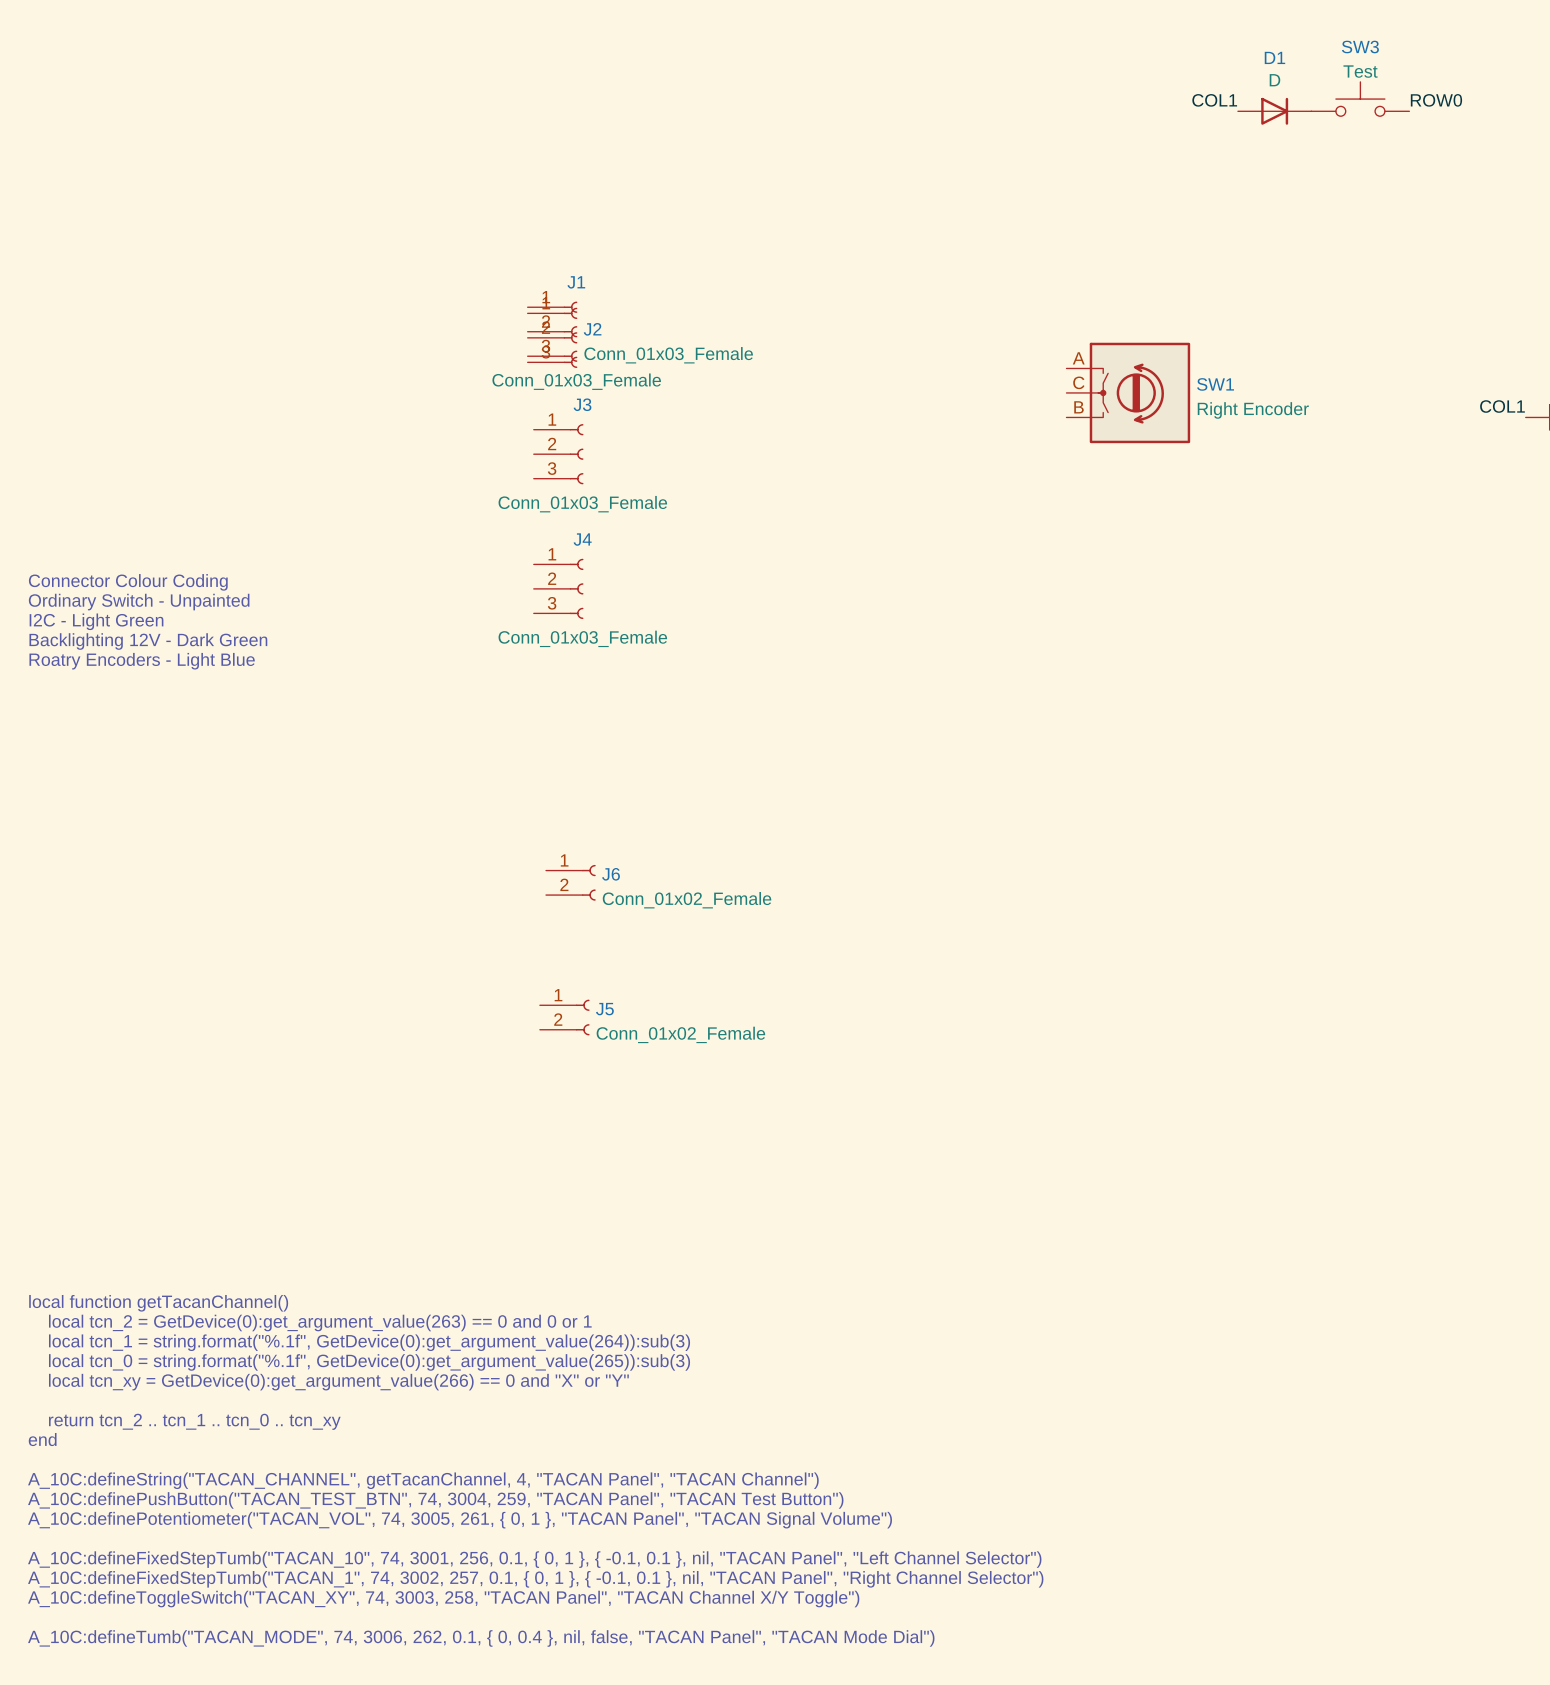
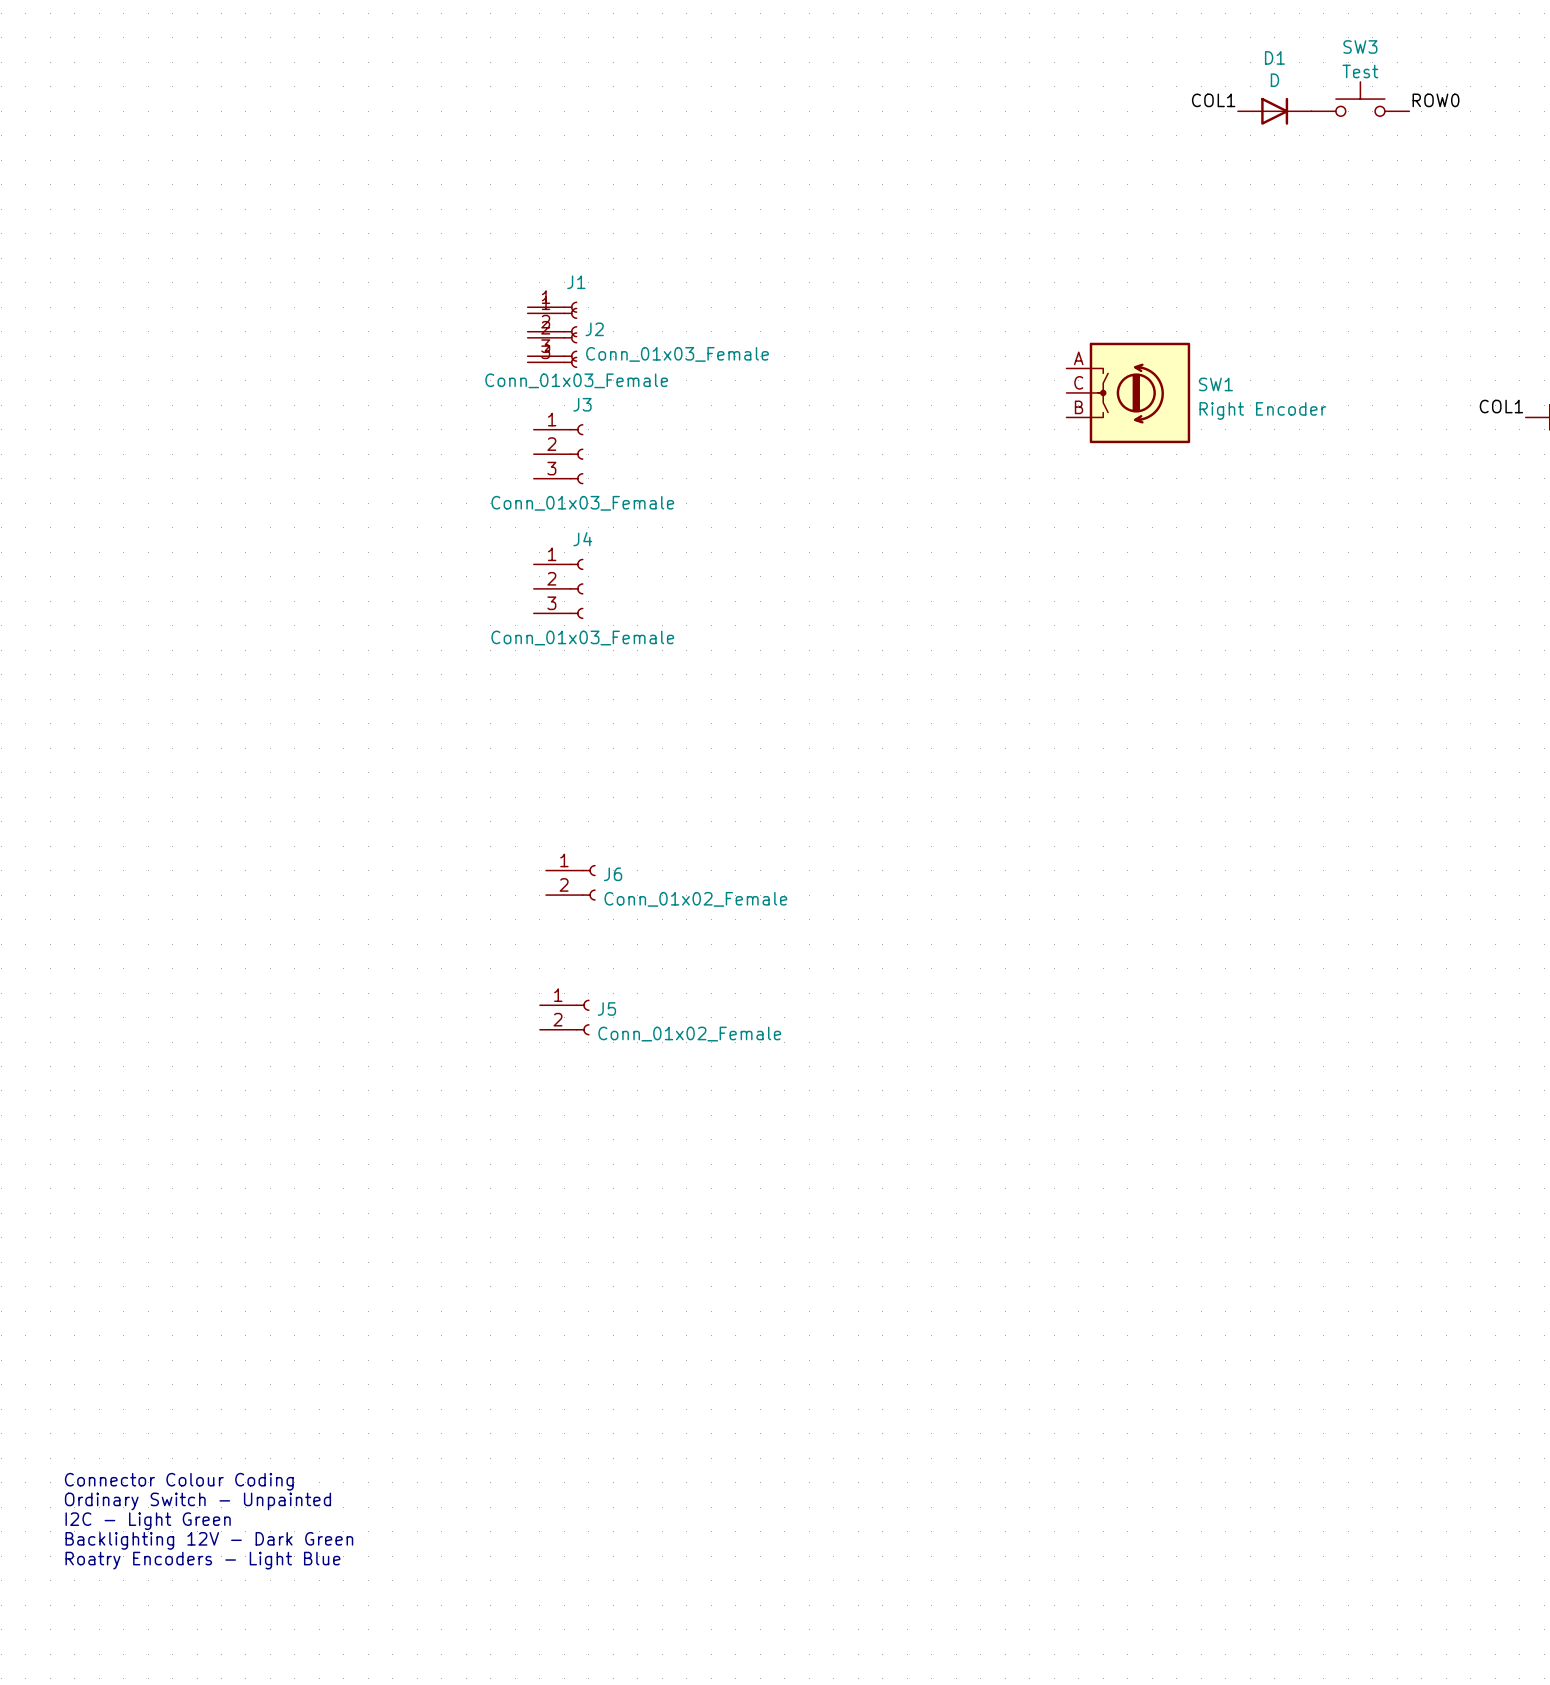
text: Connector Colour Coding (128, 582) -> none
text: Ordinary Switch - Unpainted (139, 602) -> none
text: I2C - Light Green (96, 621) -> none
text: Backlighting 12V - Dark Green (148, 641) -> none
text: Roatry Encoders - Light Blue (142, 661) -> none
text: local function getTacanChannel() (158, 1303) -> none
text: local tcn_2 = GetDevice(0):get_argument_value(263) == 0 and 0 or 1 (320, 1323) -> none
text: local tcn_1 = string.format("%.1f", GetDevice(0):get_argument_value(264)):sub(3) (369, 1342) -> none
text: local tcn_0 = string.format("%.1f", GetDevice(0):get_argument_value(265)):sub(3) (369, 1362) -> none
text: local tcn_xy = GetDevice(0):get_argument_value(266) == 0 and "X" or "Y" (338, 1382) -> none
text: return tcn_2 .. tcn_1 .. tcn_0 .. tcn_xy (194, 1421) -> none
text: end (42, 1439) -> none
text: A_10C:defineString("TACAN_CHANNEL", getTacanChannel, 4, "TACAN Panel", "TACAN Channel") (423, 1480) -> none
text: none -> Connector Colour Coding (179, 1481)
text: none -> Ordinary Switch - Unpainted (197, 1501)
text: A_10C:definePushButton("TACAN_TEST_BTN", 74, 3004, 259, "TACAN Panel", "TACAN Test Button") (435, 1500) -> none
text: none -> I2C - Light Green (148, 1521)
text: A_10C:definePotentiometer("TACAN_VOL", 74, 3005, 261, { 0, 1 }, "TACAN Panel", "TACAN Signal Volume") (460, 1520) -> none
text: none -> Backlighting 12V - Dark Green (209, 1540)
text: A_10C:defineFixedStepTumb("TACAN_10", 74, 3001, 256, 0.1, { 0, 1 }, { -0.1, 0.1 }, nil, "TACAN Panel", "Left Channel Selector") (534, 1559) -> none
text: none -> Roatry Encoders - Light Blue (202, 1560)
text: A_10C:defineFixedStepTumb("TACAN_1", 74, 3002, 257, 0.1, { 0, 1 }, { -0.1, 0.1 }, nil, "TACAN Panel", "Right Channel Selector") (535, 1579) -> none
text: A_10C:defineToggleSwitch("TACAN_XY", 74, 3003, 258, "TACAN Panel", "TACAN Channel X/Y Toggle") (443, 1599) -> none
text: A_10C:defineTumb("TACAN_MODE", 74, 3006, 262, 0.1, { 0, 0.4 }, nil, false, "TACAN Panel", "TACAN Mode Dial") (481, 1638) -> none

